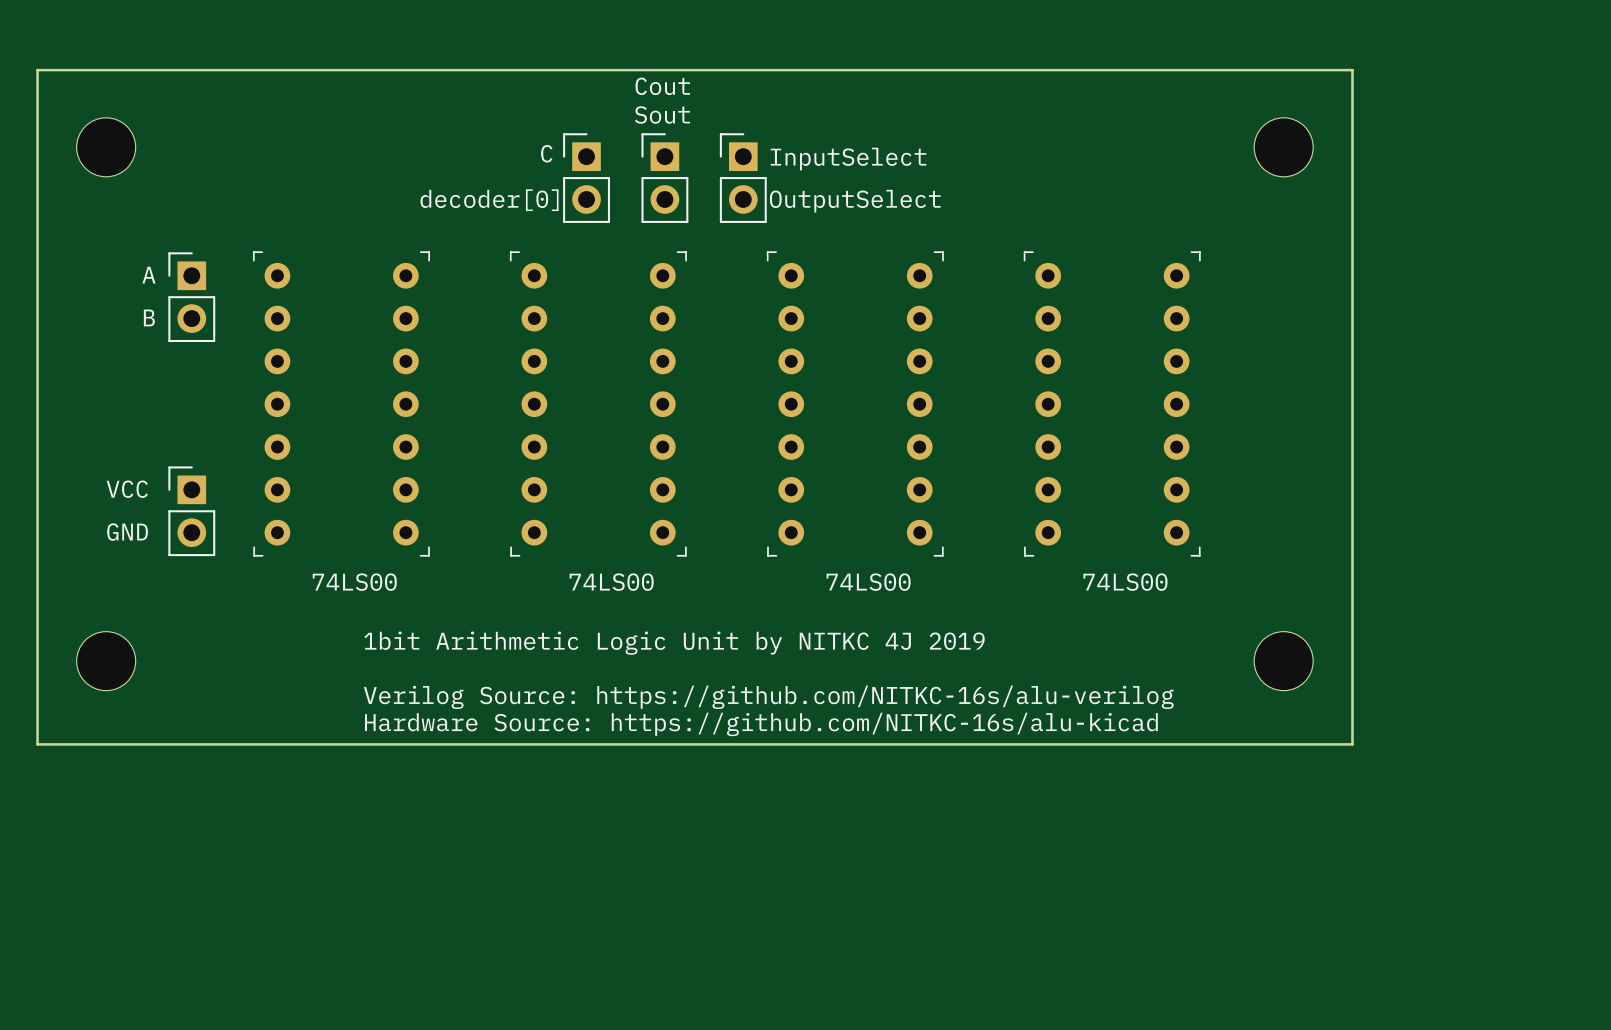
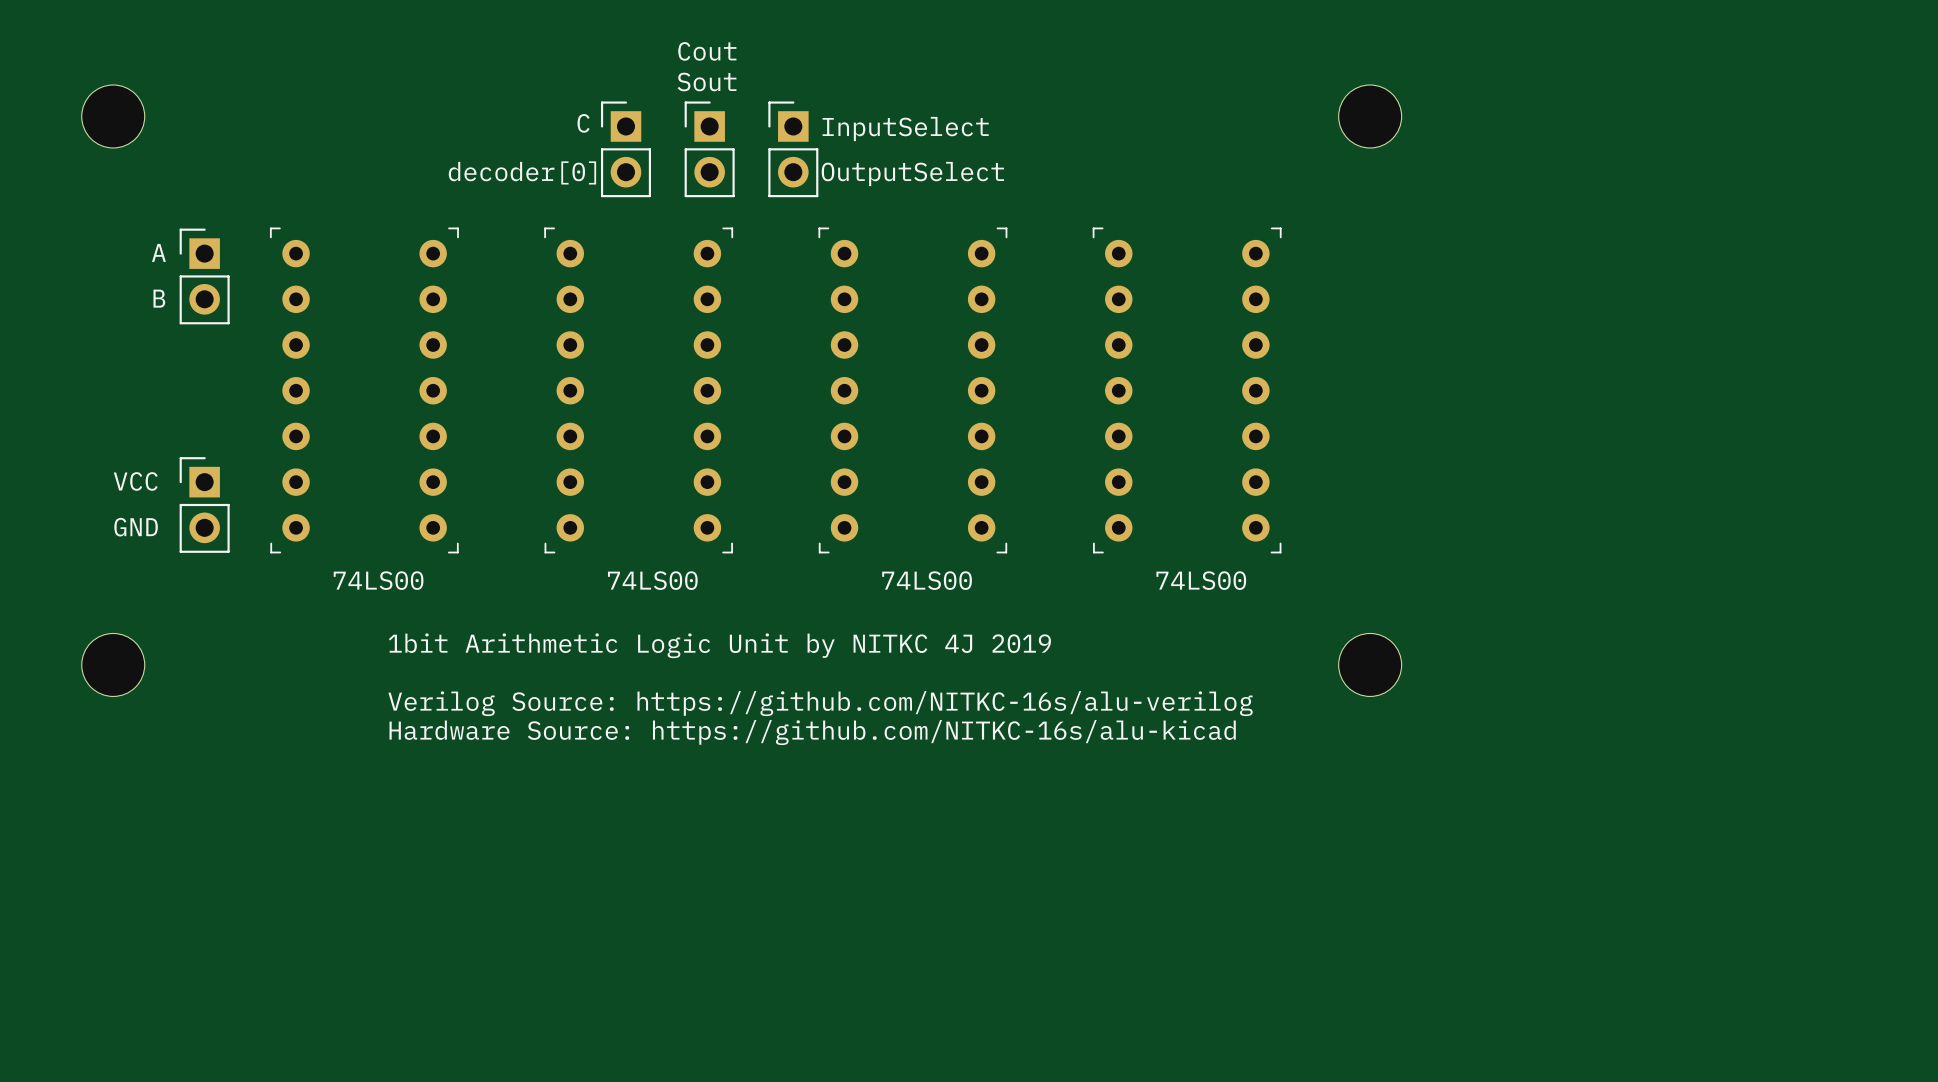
board edge: (37, 70) (37, 744) (1352, 744) (1352, 70) (37, 70) -> none

